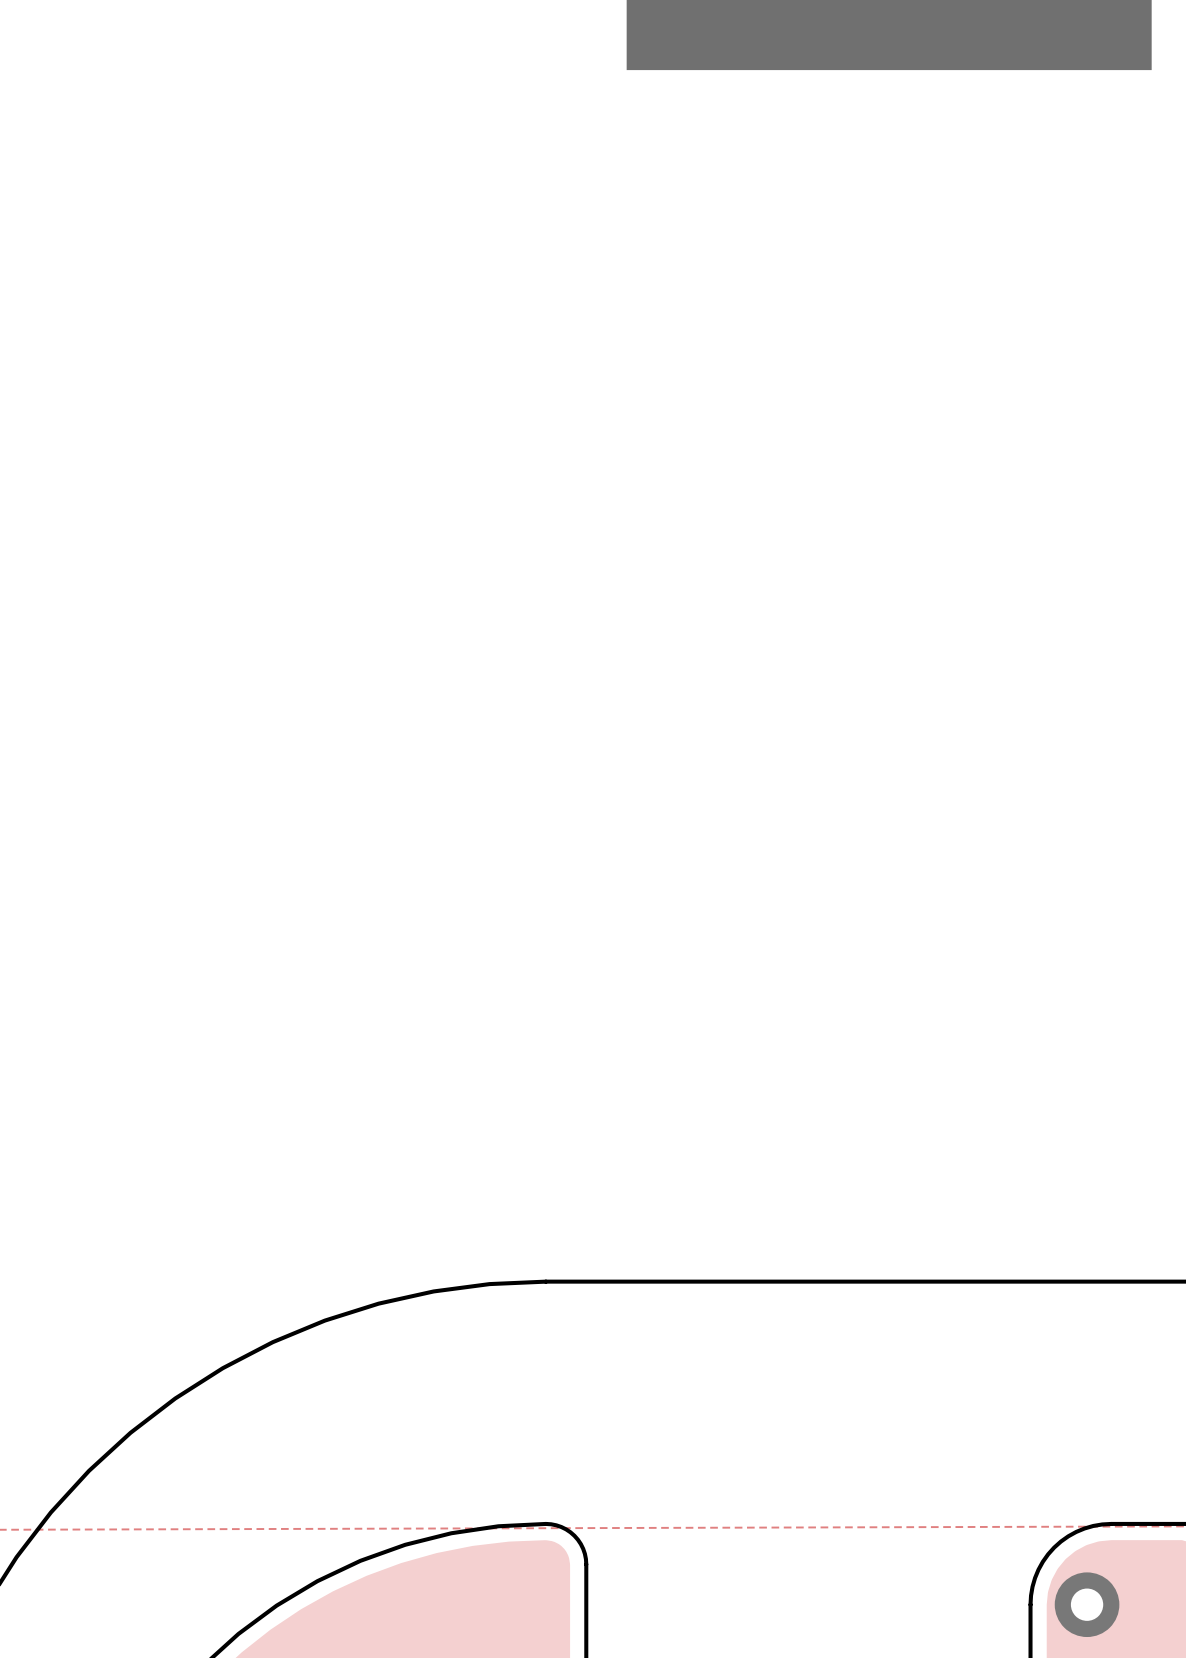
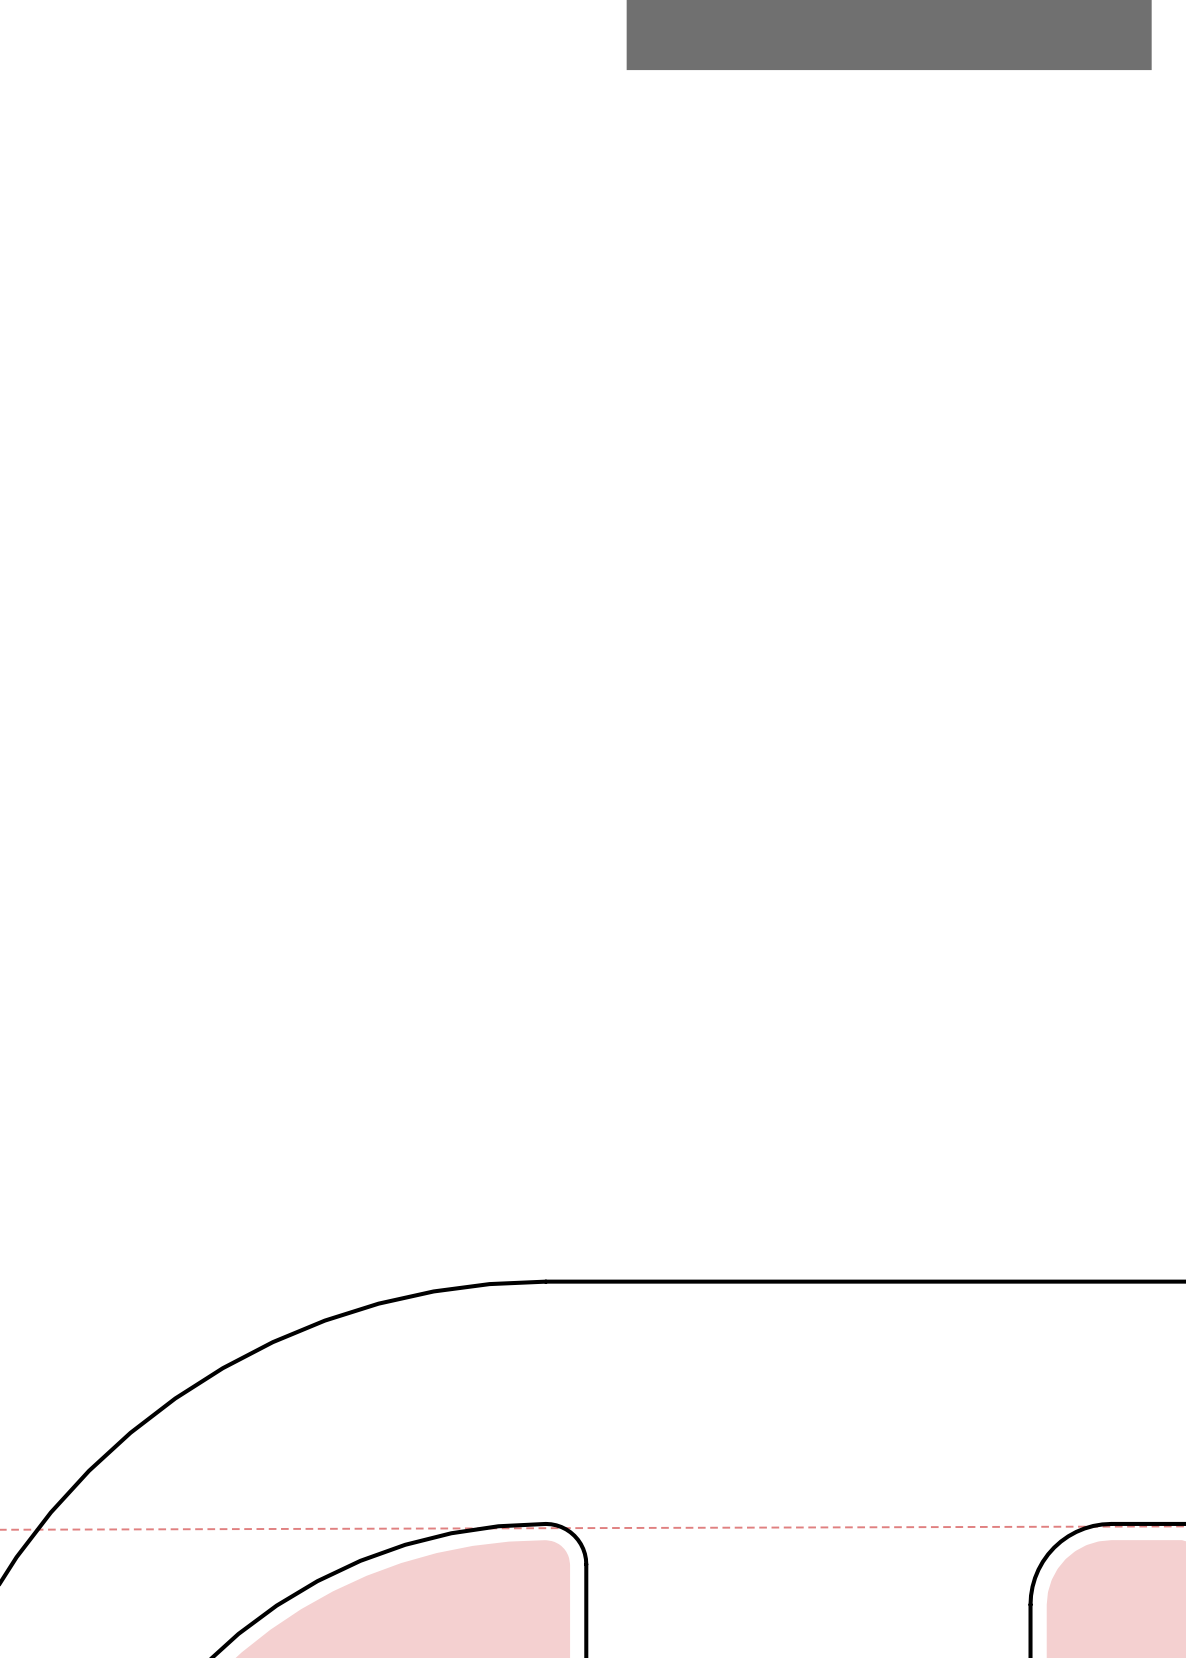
via: (1087, 1604) -> none

